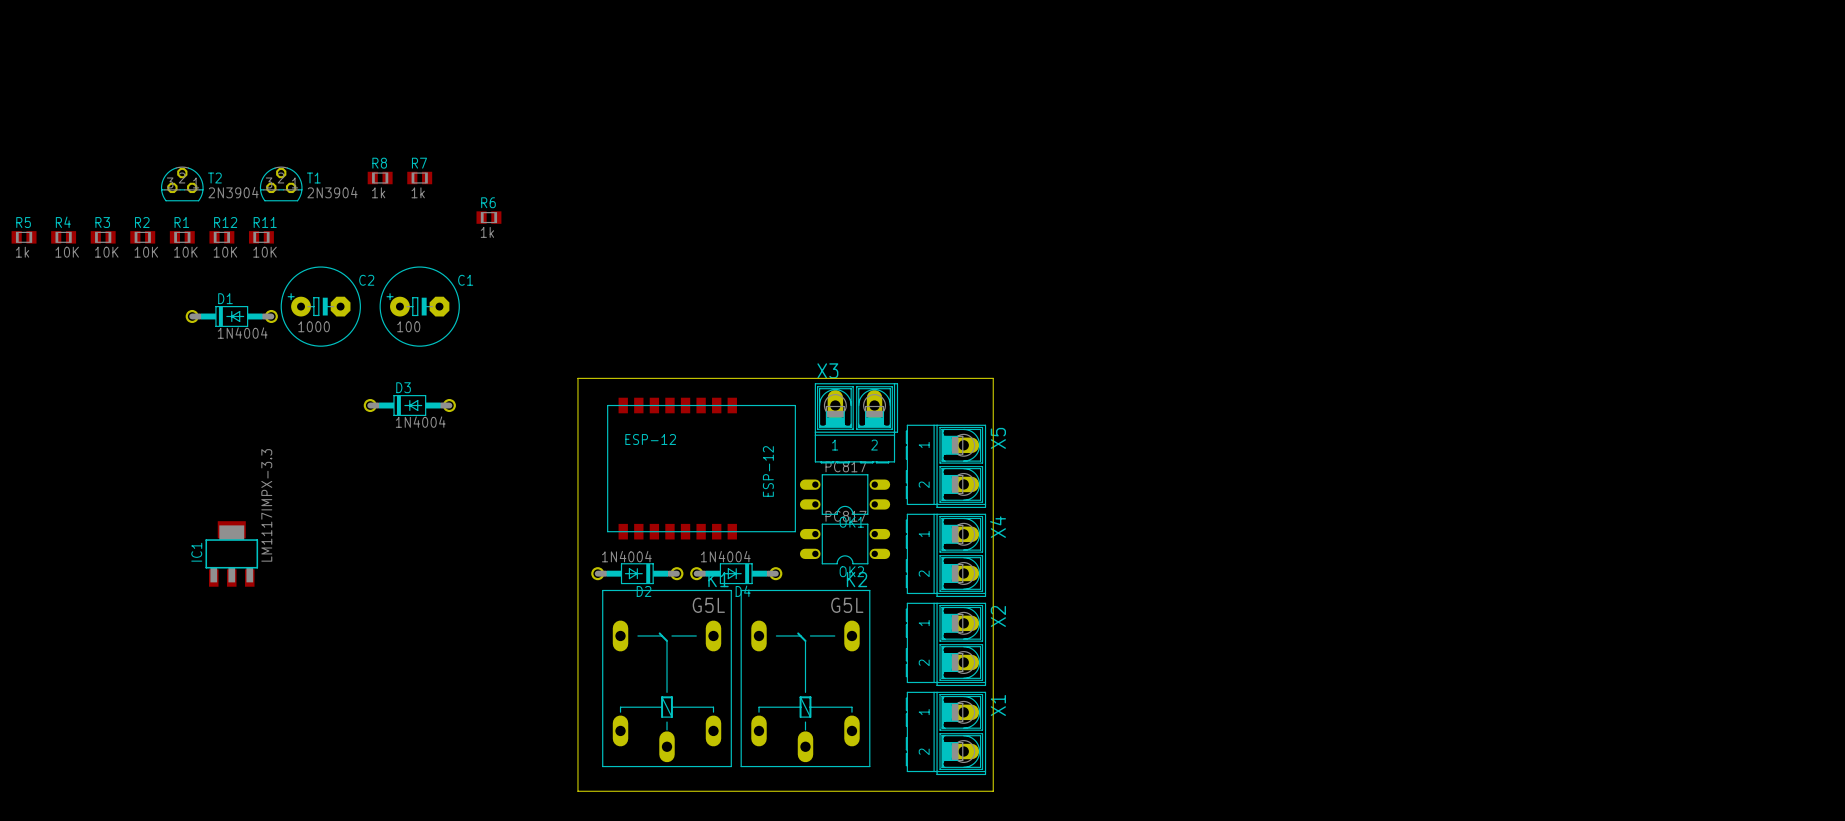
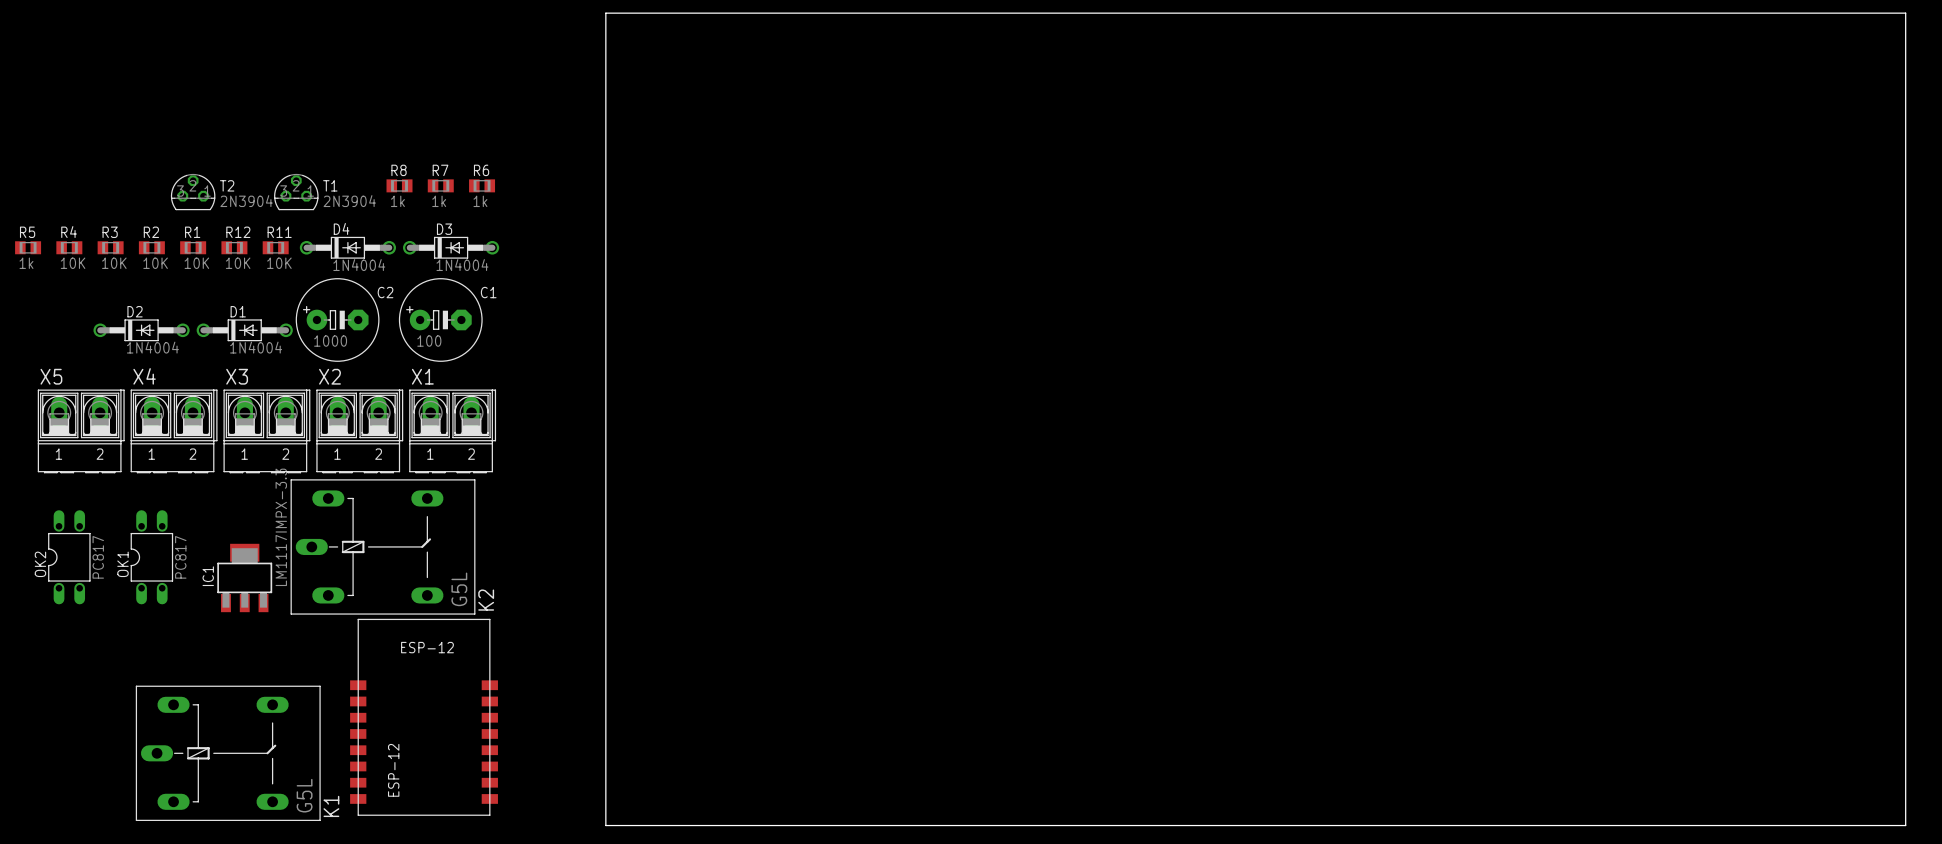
R6 position: (488, 217) -> (482, 185)
board edge: (577, 378) (993, 378) (993, 791) -> (605, 394) (605, 13) (1905, 13) (1905, 825) (1039, 825)
ESP-12 footprint: [607, 397, 796, 540] -> [350, 618, 498, 816]
D3 position: (409, 405) -> (451, 247)
X3 position: (856, 423) -> (266, 431)
X5 footprint: [905, 424, 987, 508] -> [37, 389, 125, 474]
X5 name position: X5 (998, 438) -> X5 (51, 376)
ESP-12 name position: ESP-12 (650, 439) -> ESP-12 (393, 770)
OK1 rotation: 0° (845, 494) -> 90° clockwise (151, 557)
OK1 position: (845, 494) -> (151, 557)
X4 footprint: [905, 513, 987, 598] -> [130, 389, 218, 474]
X4 name position: X4 (998, 527) -> X4 (144, 376)
OK2 rotation: 0° (845, 543) -> 90° clockwise (69, 557)
OK2 position: (845, 543) -> (69, 557)
D2 rotation: 0° (637, 573) -> 180° (141, 330)
D2 position: (637, 573) -> (141, 330)
D4 rotation: 0° (736, 573) -> 180° (347, 247)
D4 position: (736, 573) -> (347, 247)
X2 footprint: [905, 602, 987, 687] -> [316, 389, 404, 474]
X2 name position: X2 (998, 616) -> X2 (329, 376)
K1 rotation: 0° (667, 678) -> 90° clockwise (228, 753)
K1 position: (667, 678) -> (228, 753)
K2 rotation: 0° (805, 678) -> 90° clockwise (382, 546)
K2 position: (805, 678) -> (382, 546)
X1 footprint: [905, 691, 987, 776] -> [409, 389, 497, 474]
X1 name position: X1 (998, 705) -> X1 (422, 376)

